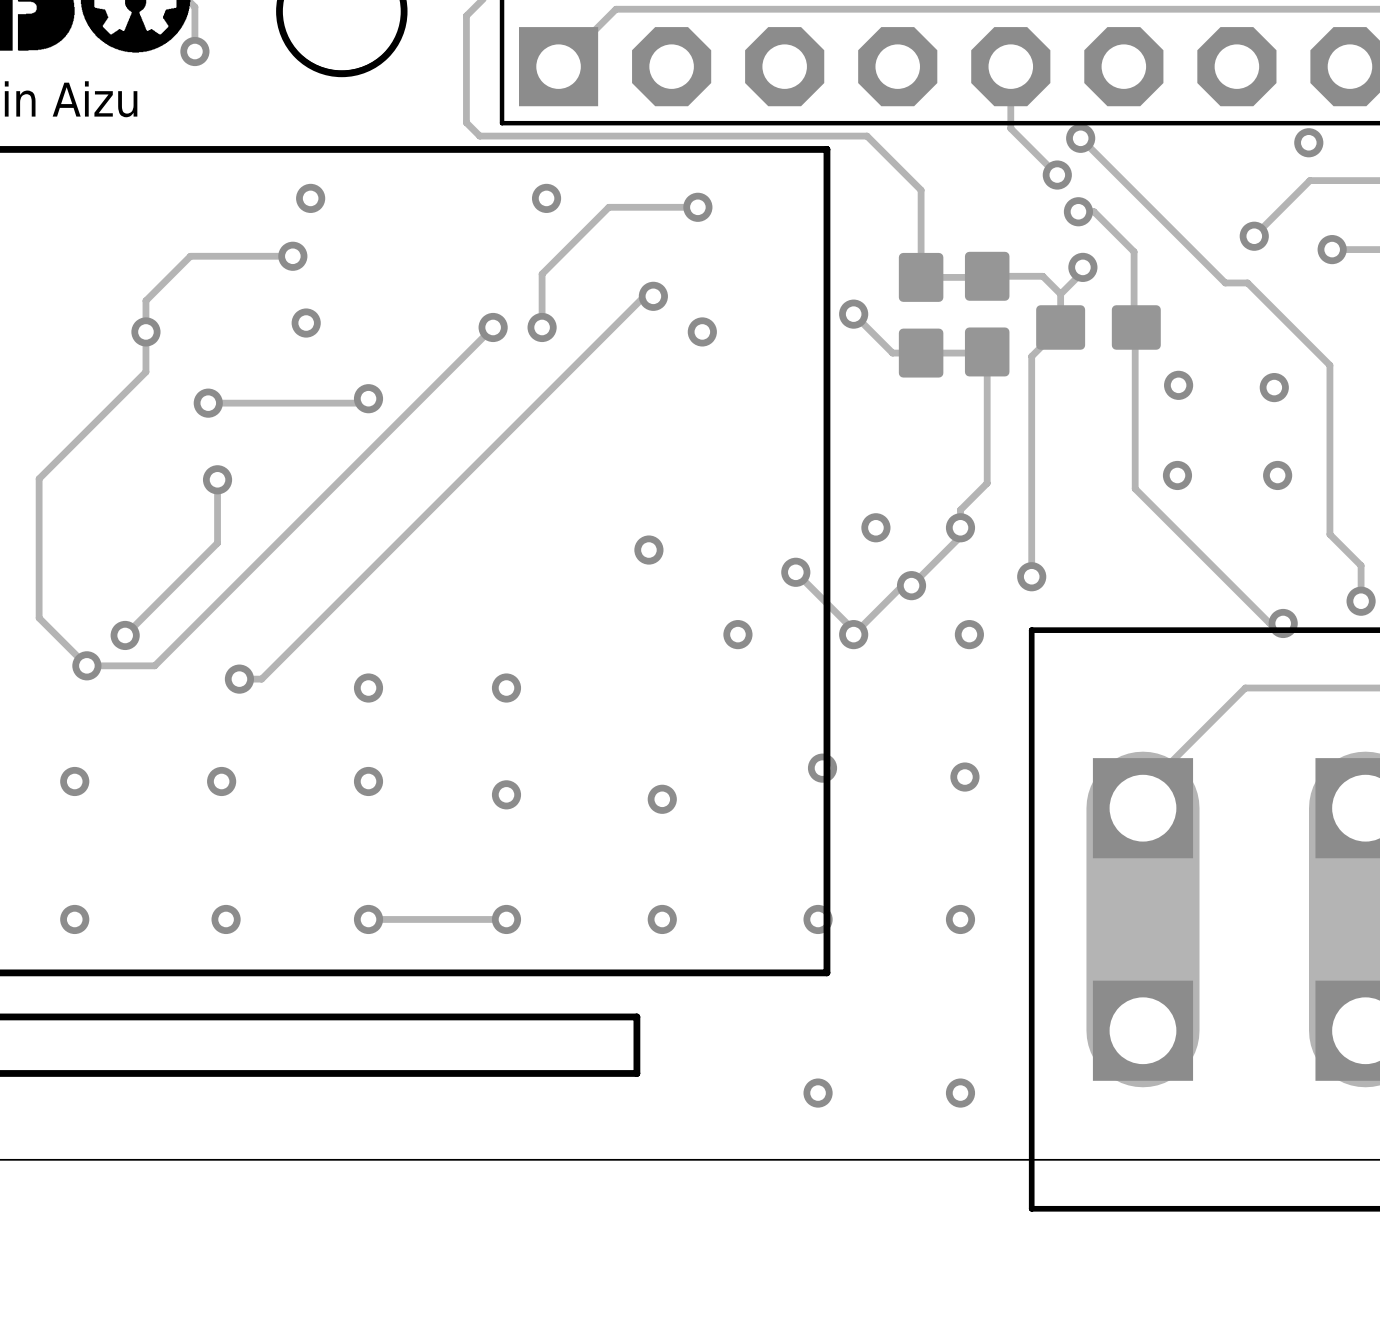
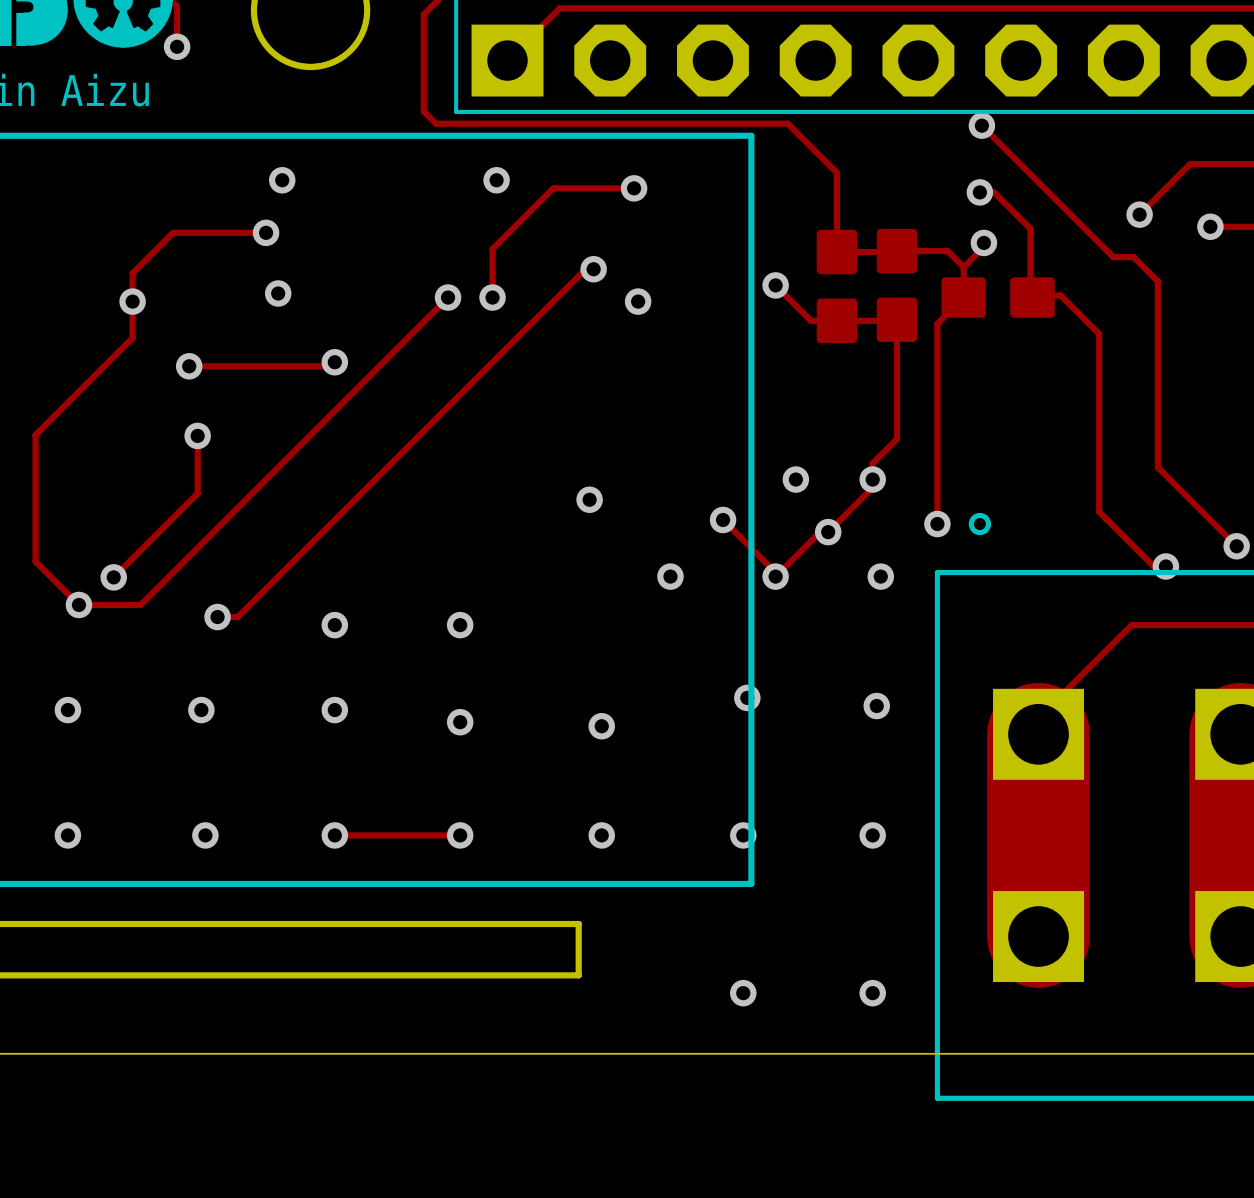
track: (1010, 66) (1010, 128) (1057, 175) -> none
via: (1308, 142) -> none
via: (1057, 175) -> none
track: (1274, 309) (1329, 365) (1329, 534) (1361, 565) (1361, 601) -> (1157, 281) (1157, 467) (1236, 546)
track: (1135, 325) (1135, 488) (1209, 563) -> (1031, 295) (1060, 295) (1099, 333) (1099, 511)
via: (1178, 385) -> none
via: (1274, 387) -> none
via: (1177, 475) -> none
via: (1277, 475) -> none
part: none -> (979, 524)

